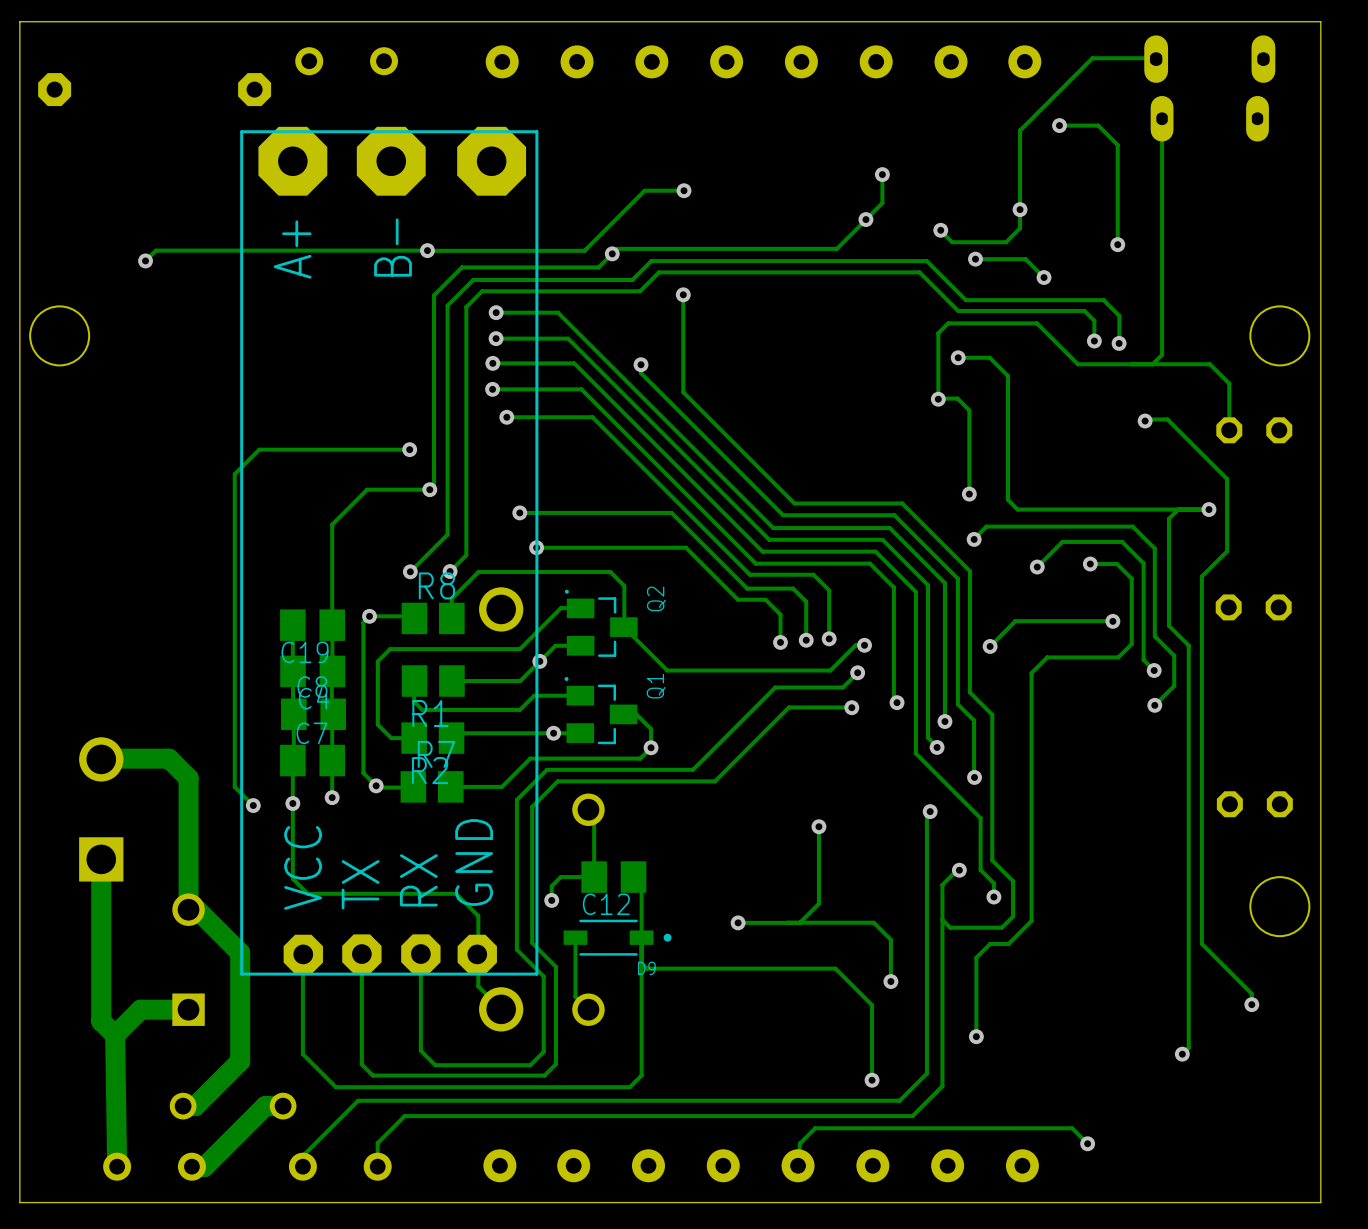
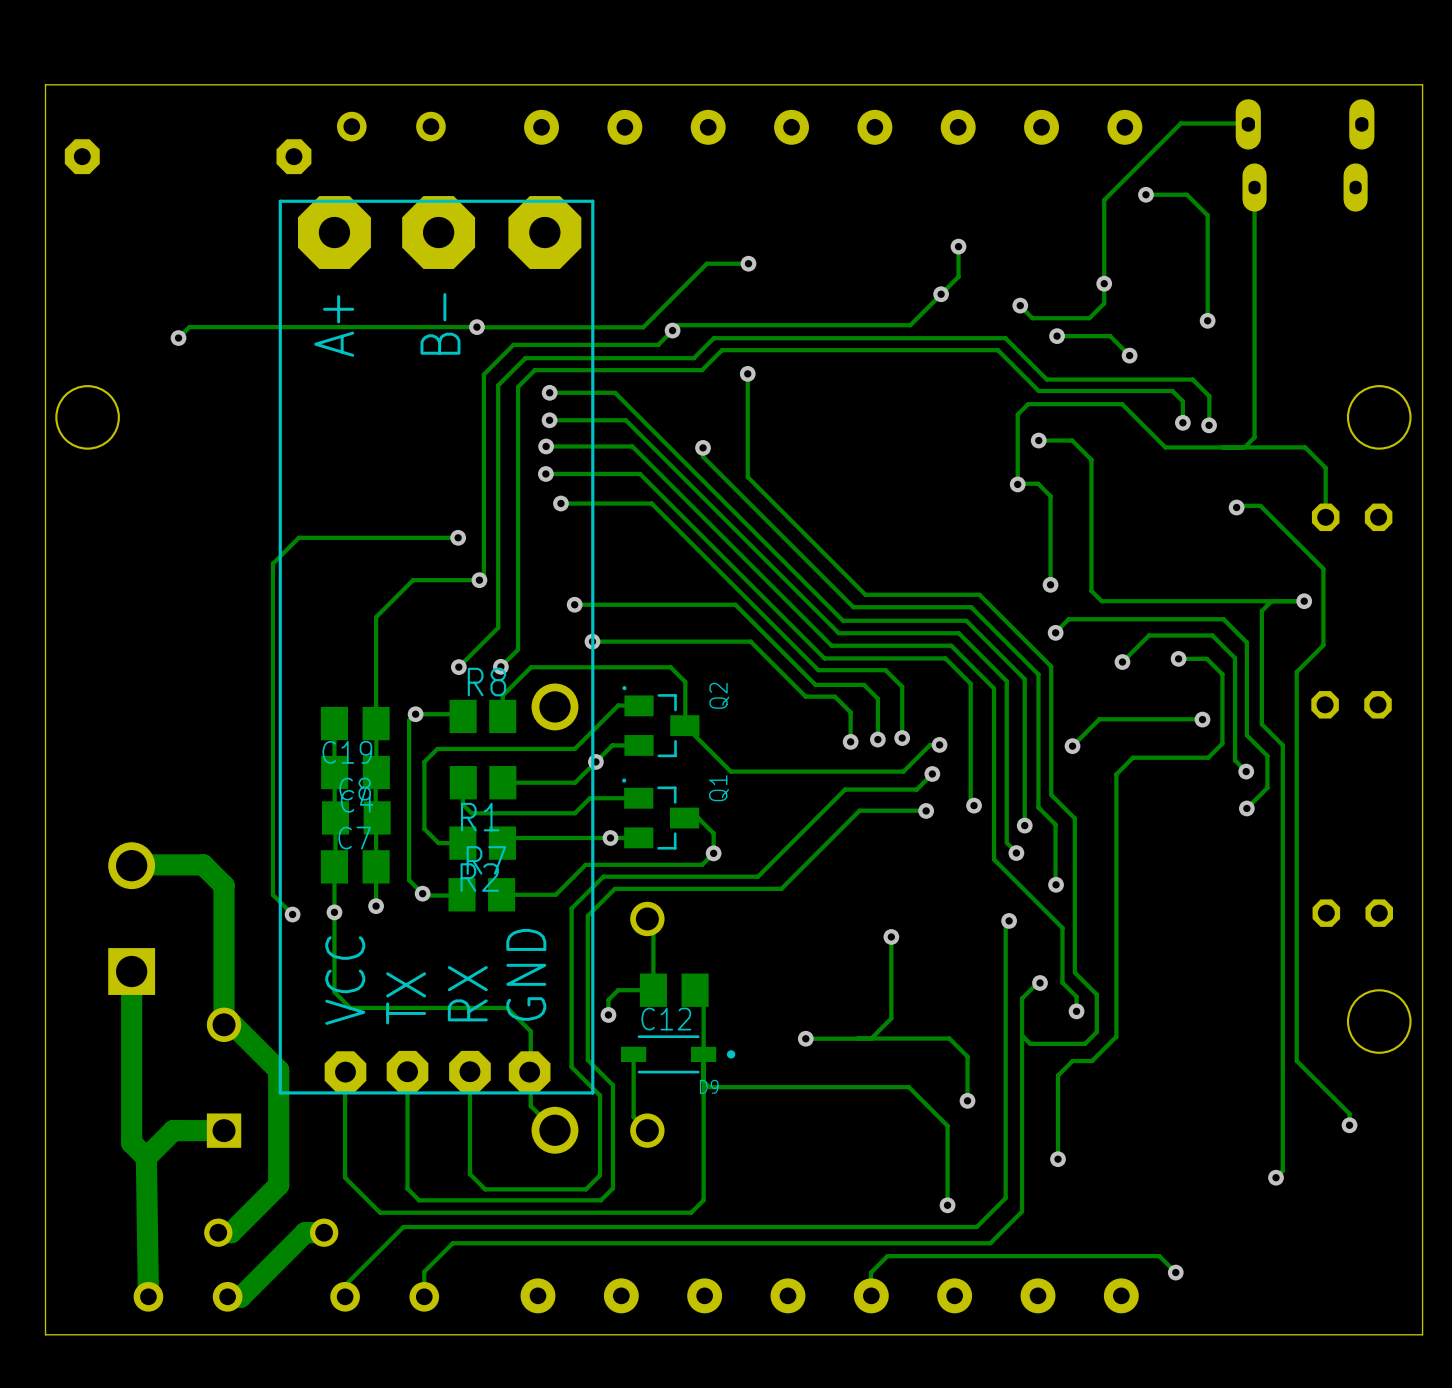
part footprint: [485, 45, 1042, 79] -> [524, 109, 1143, 145]
part footprint: [483, 1149, 1039, 1183] -> [520, 1278, 1139, 1314]

